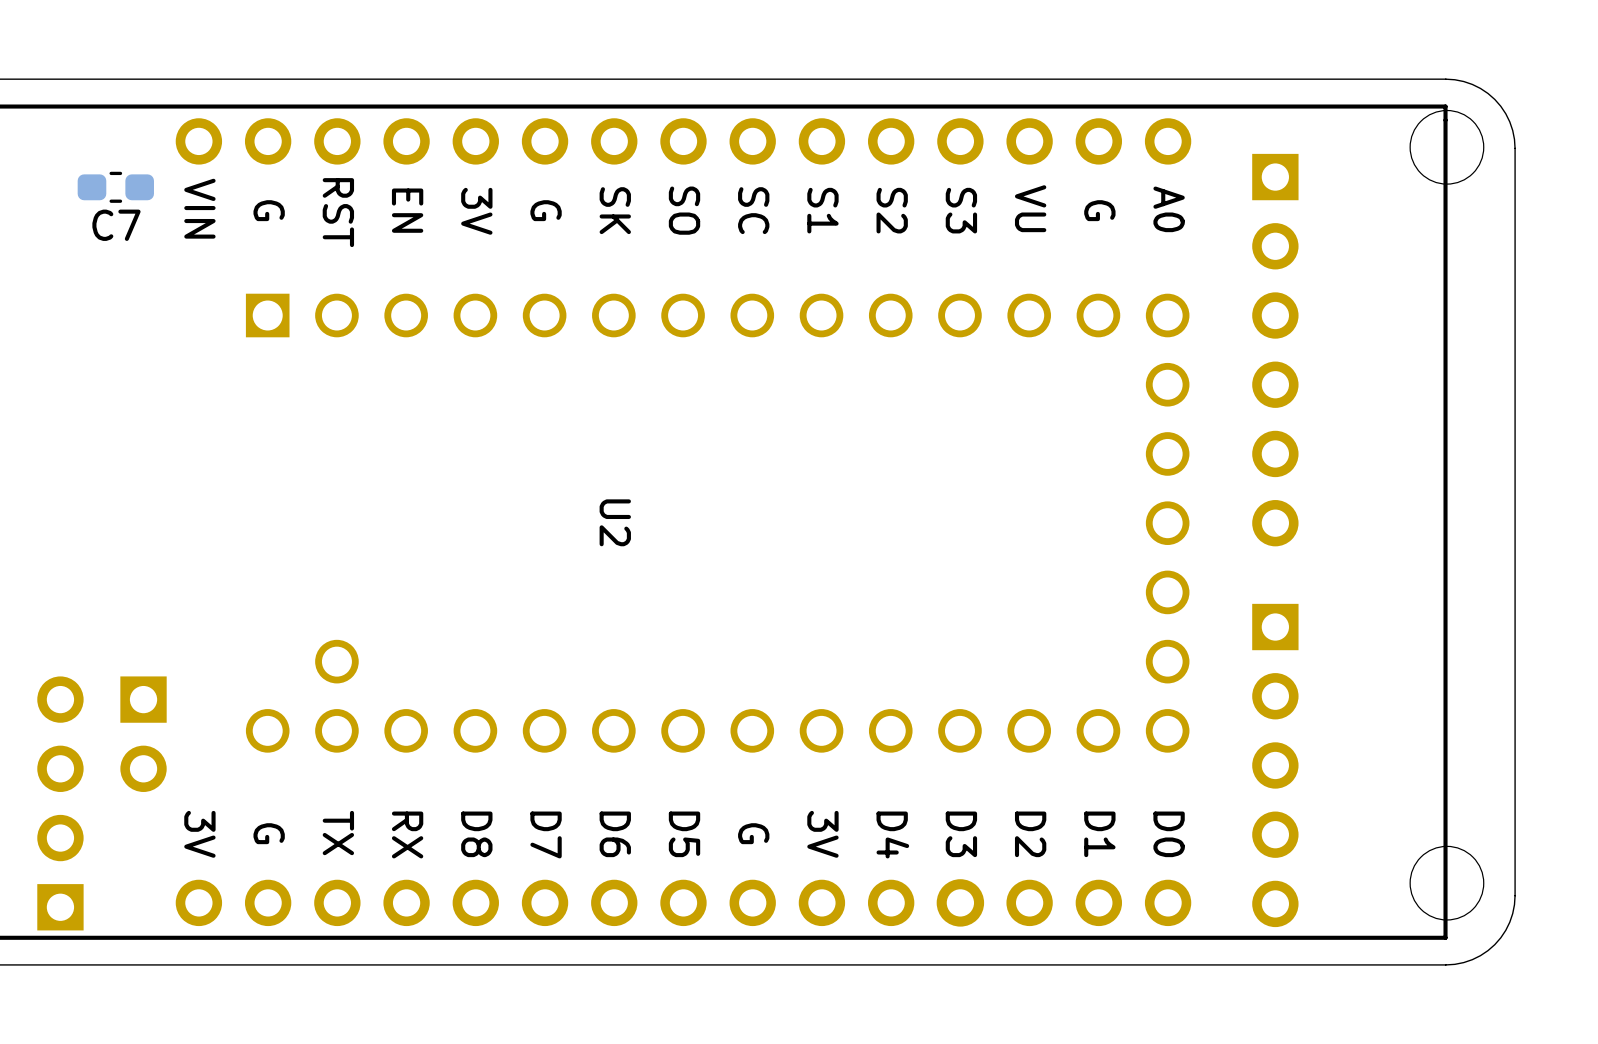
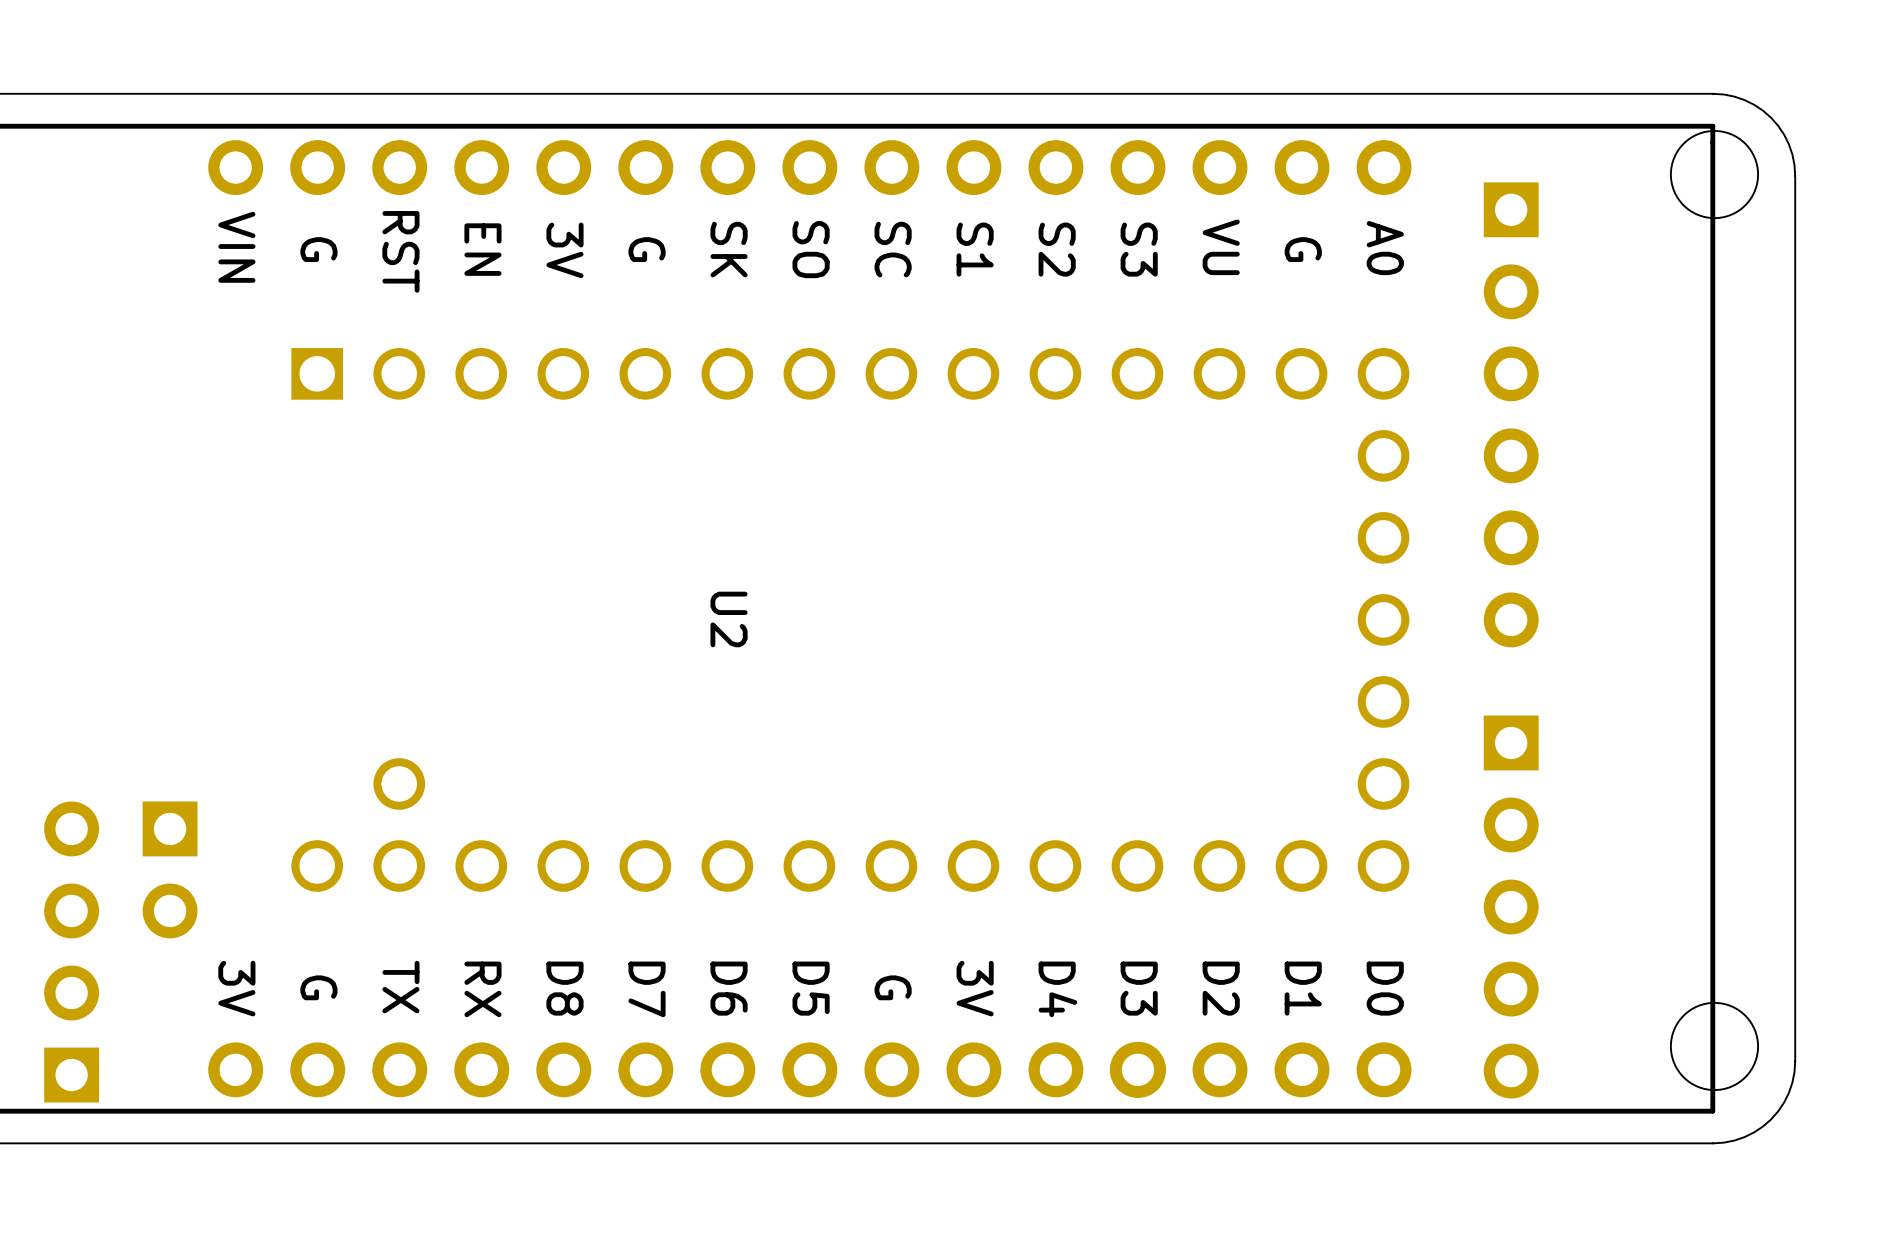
C7: (115, 187) -> none

